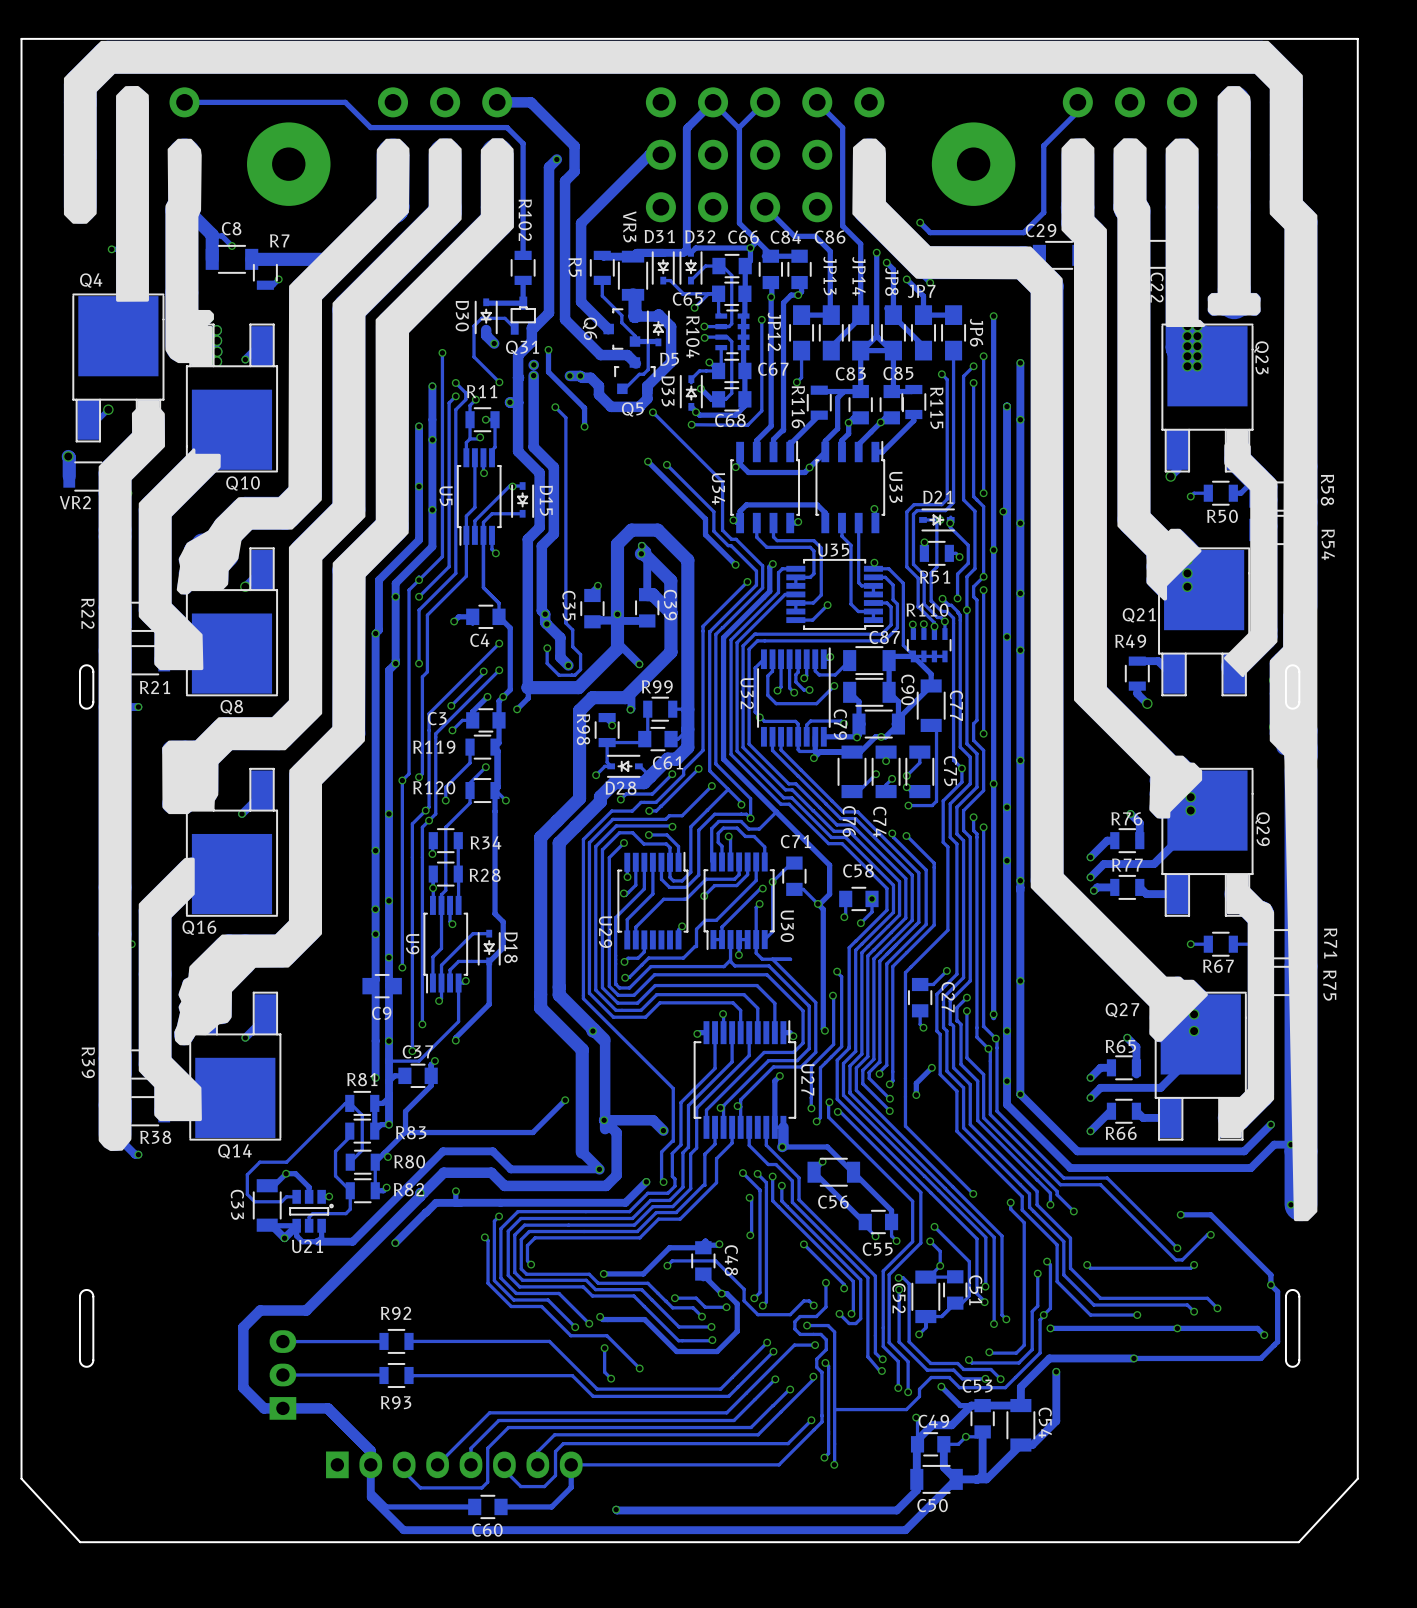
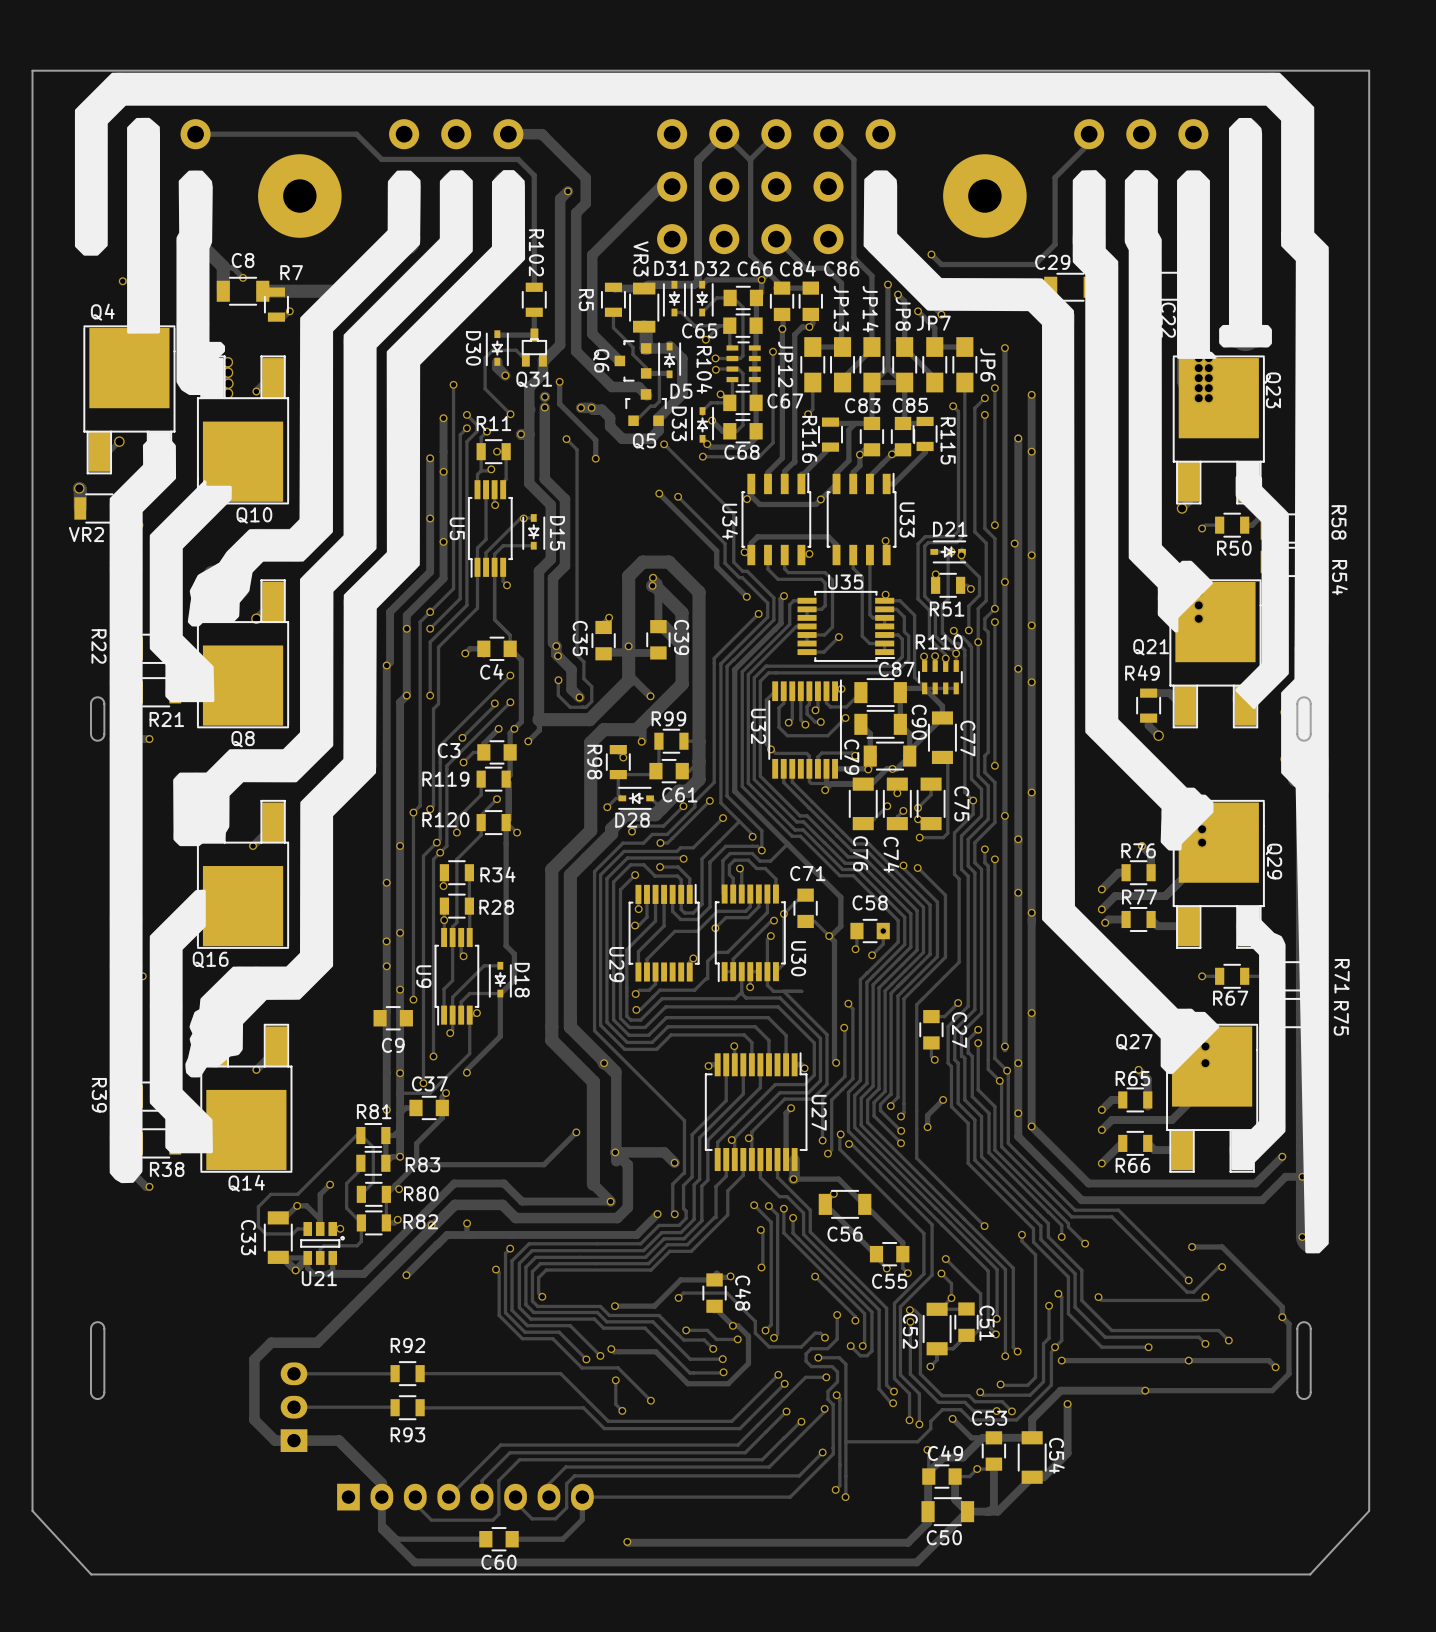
track: none -> (330, 1184) (320, 1194) (320, 1219)
via: none -> (330, 1184)

